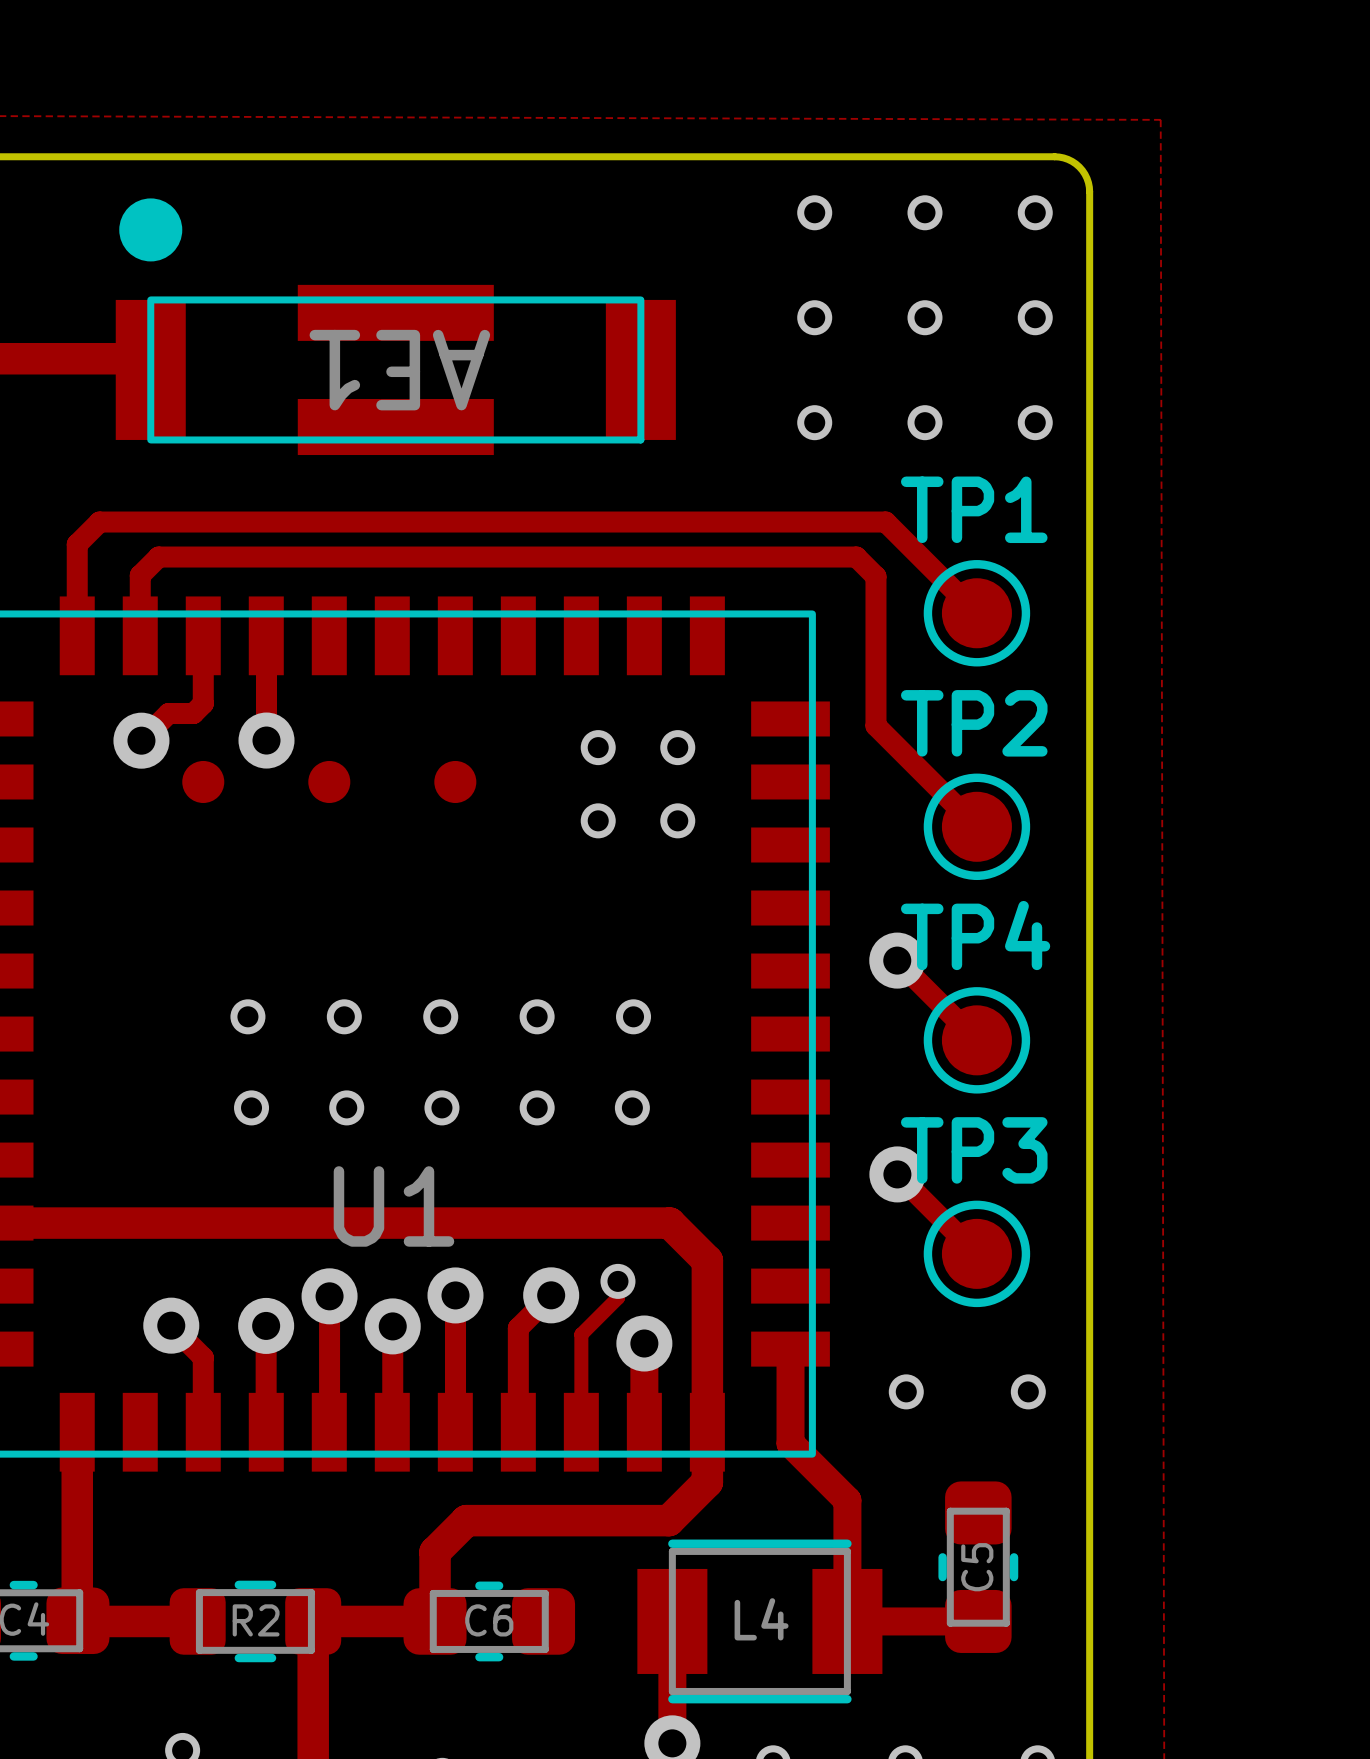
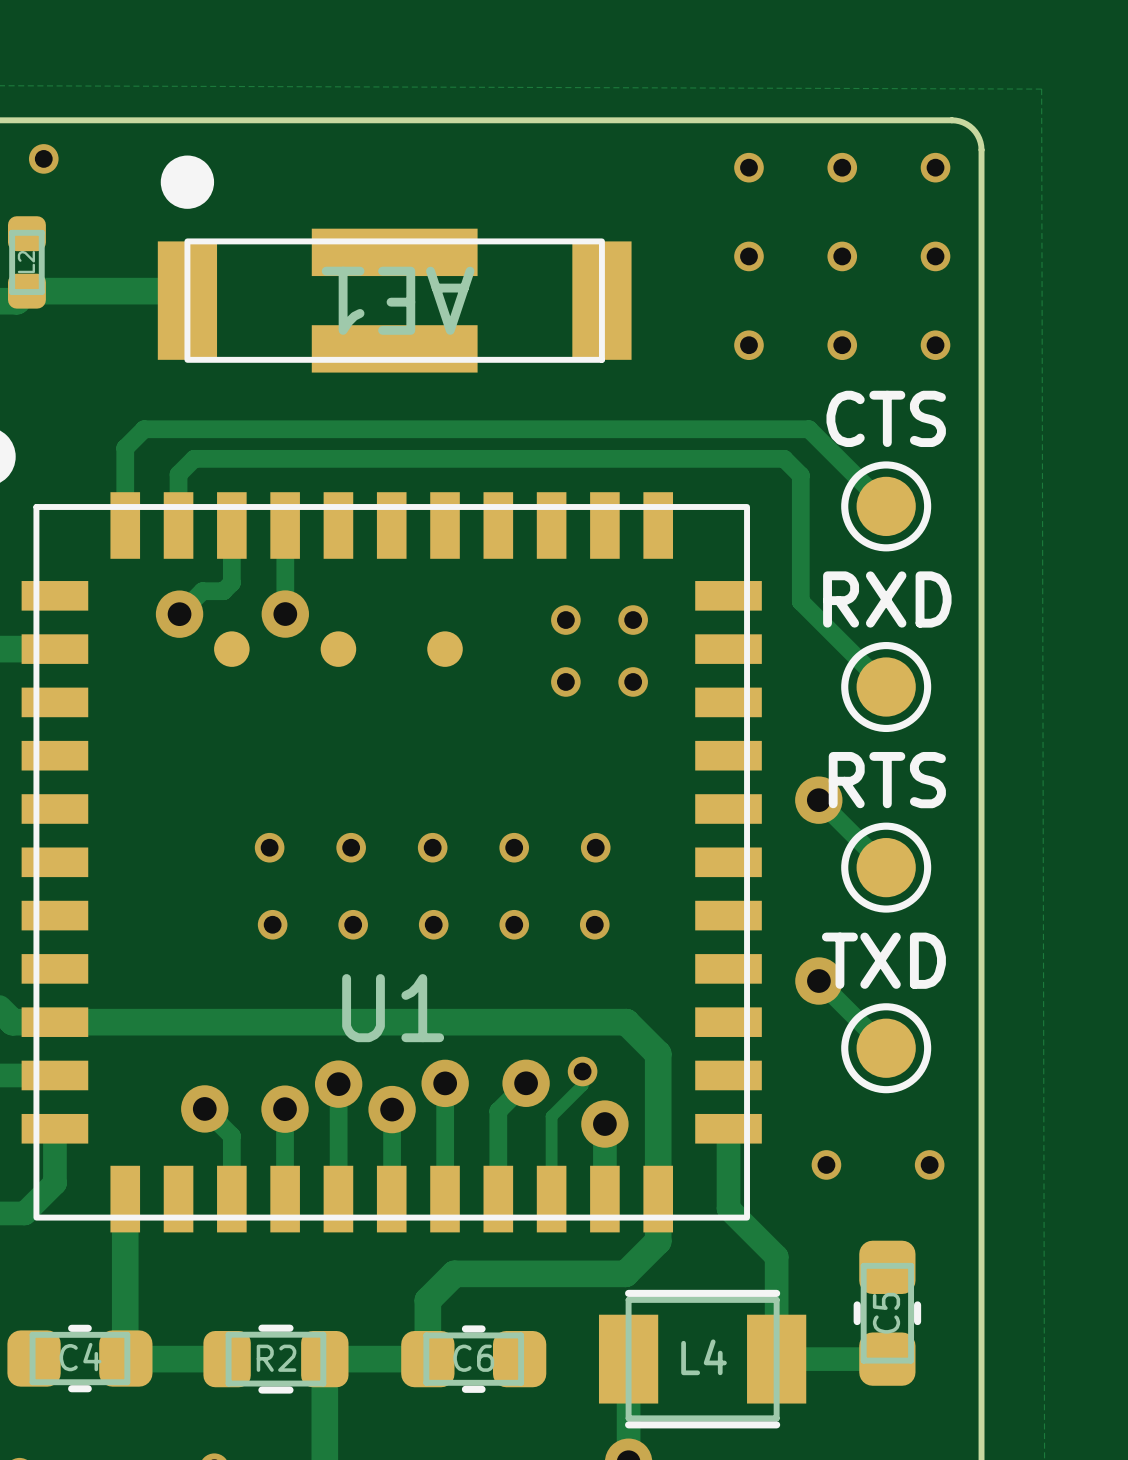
TP1 name: TP1 (974, 509) -> CTS (886, 418)
TP2 name: TP2 (974, 723) -> RXD (887, 599)
TP4 name: TP4 (975, 935) -> RTS (887, 780)
TP3 name: TP3 (974, 1150) -> TXD (883, 960)

